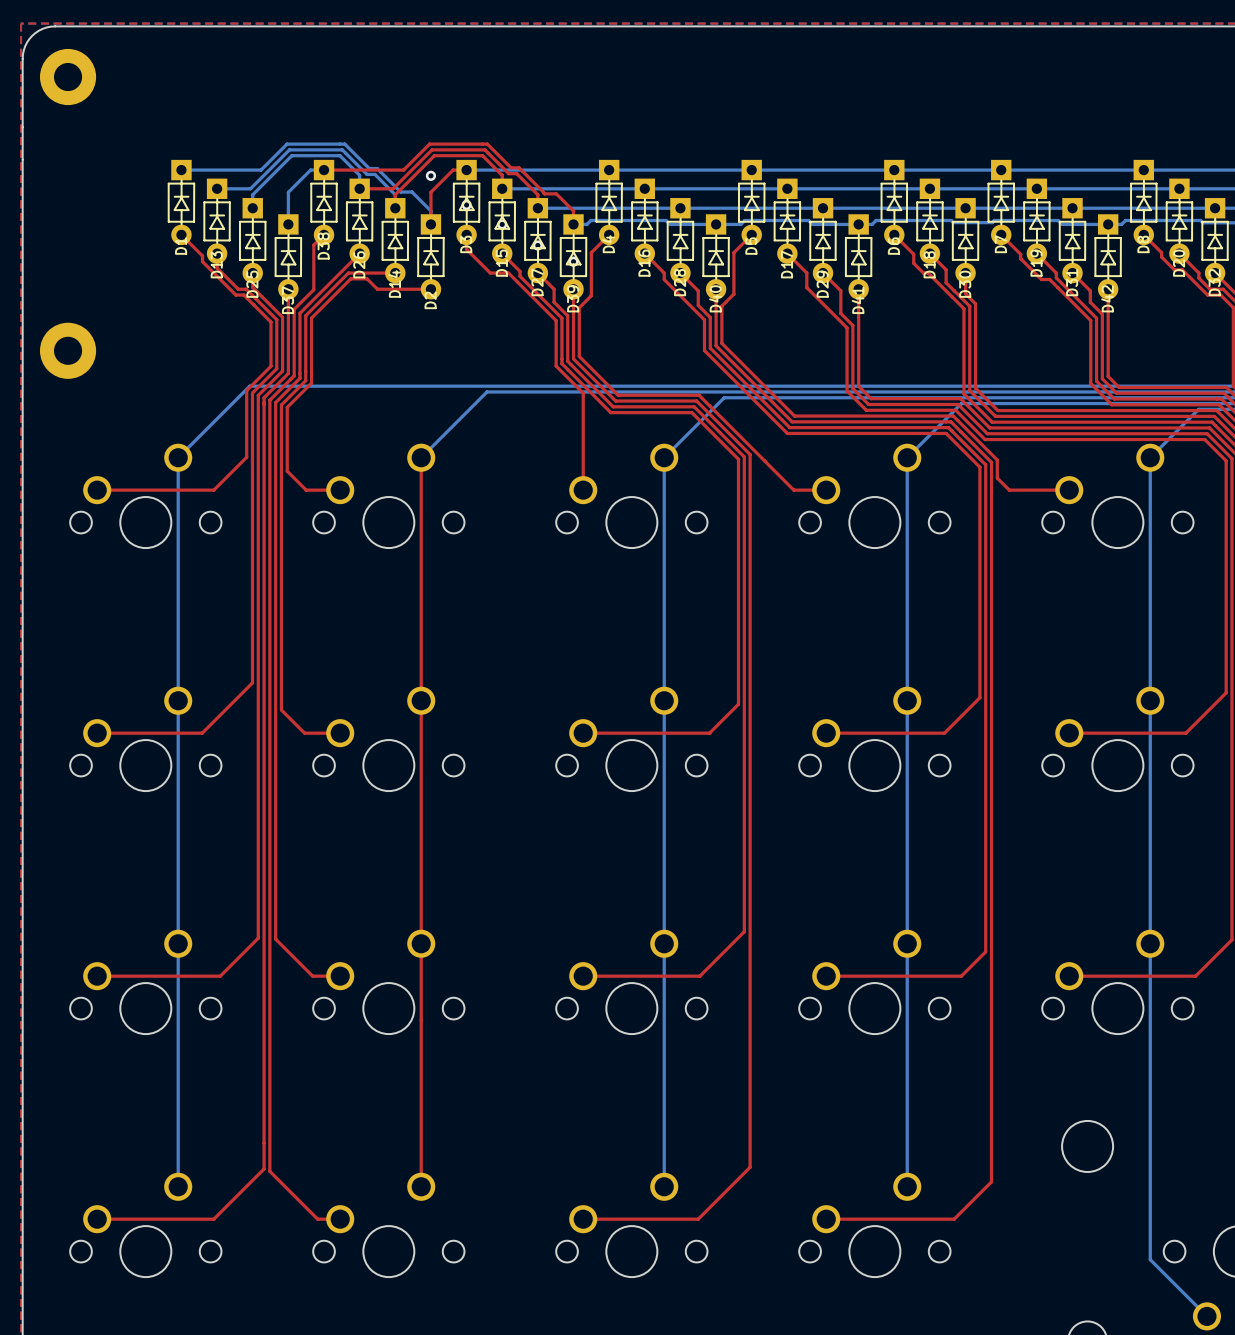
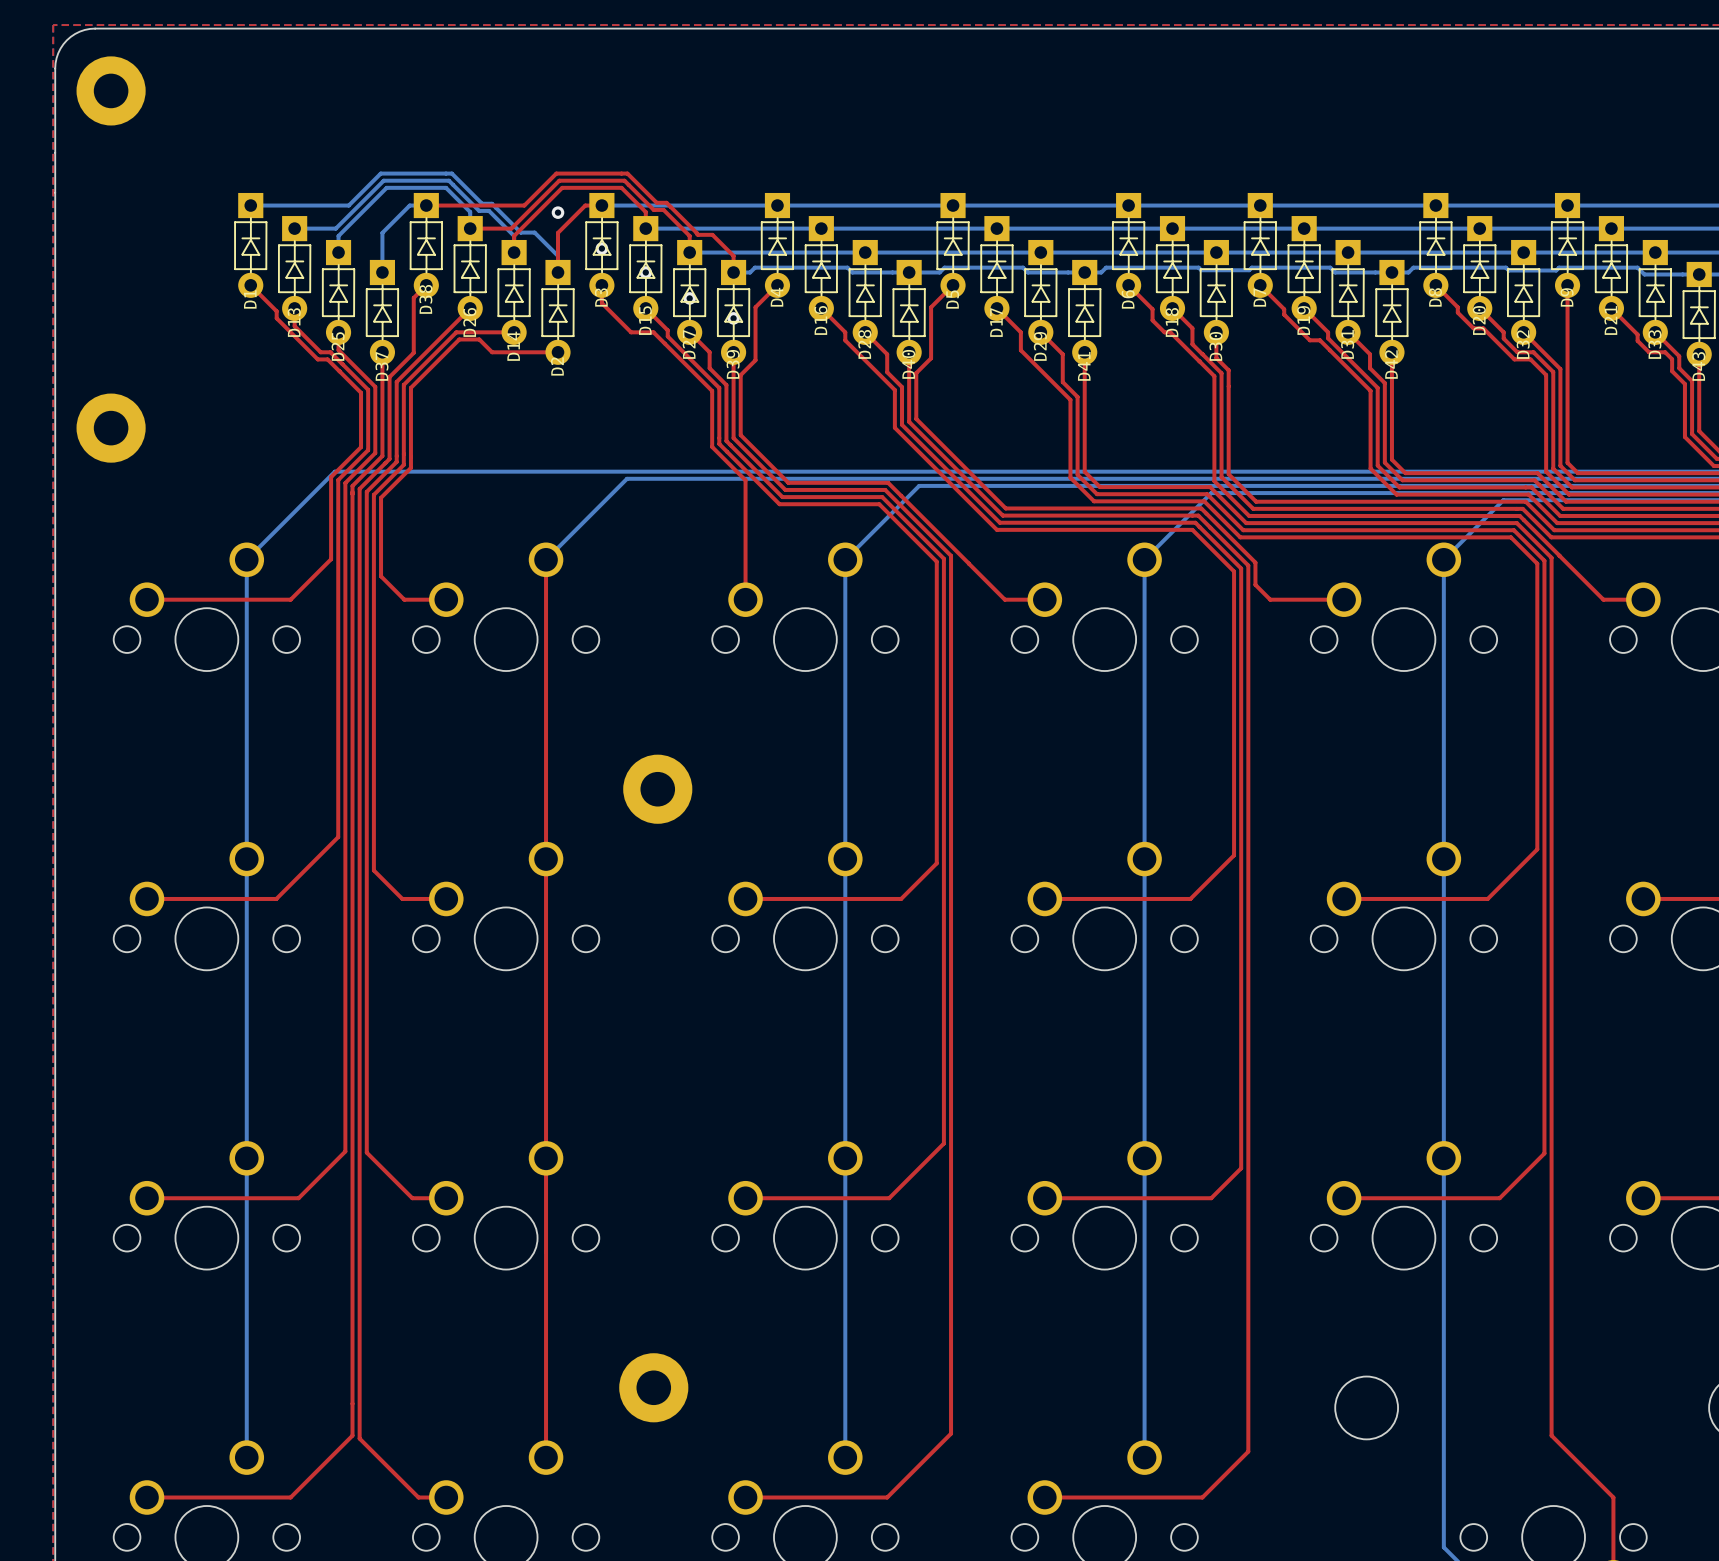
part: none -> (657, 789)
part: none -> (653, 1387)

